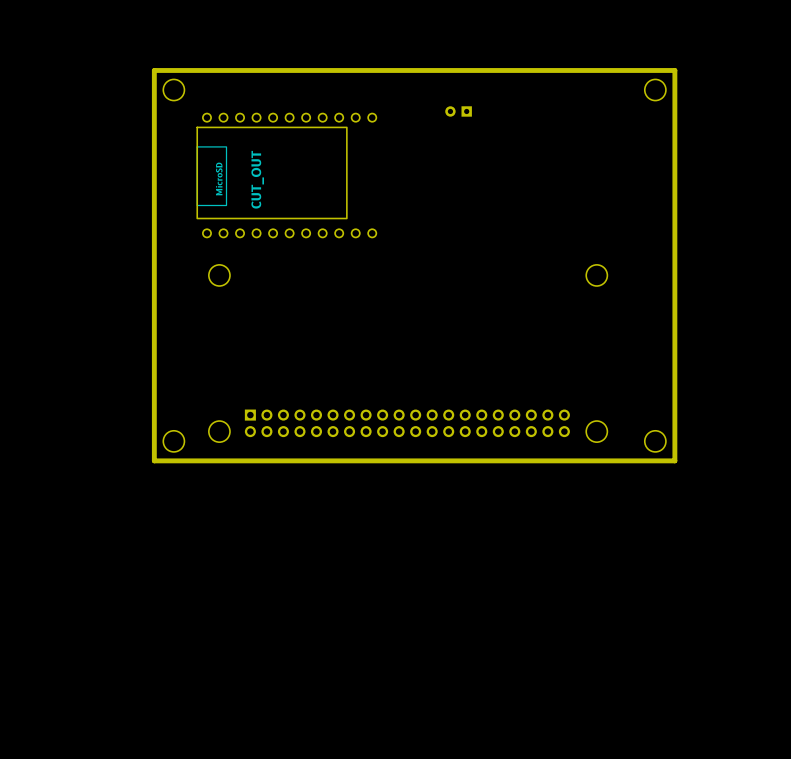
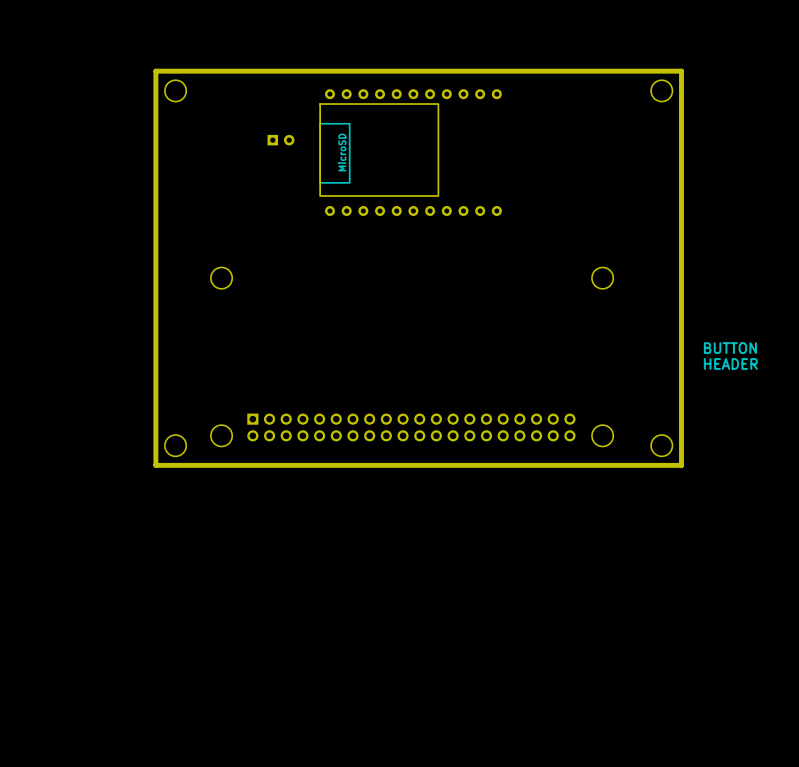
part: (458, 111) -> none
part: none -> (281, 140)
part: none -> (410, 152)
part: (286, 175) -> none
text: none -> BUTTON (730, 348)
text: none -> HEADER (730, 363)

